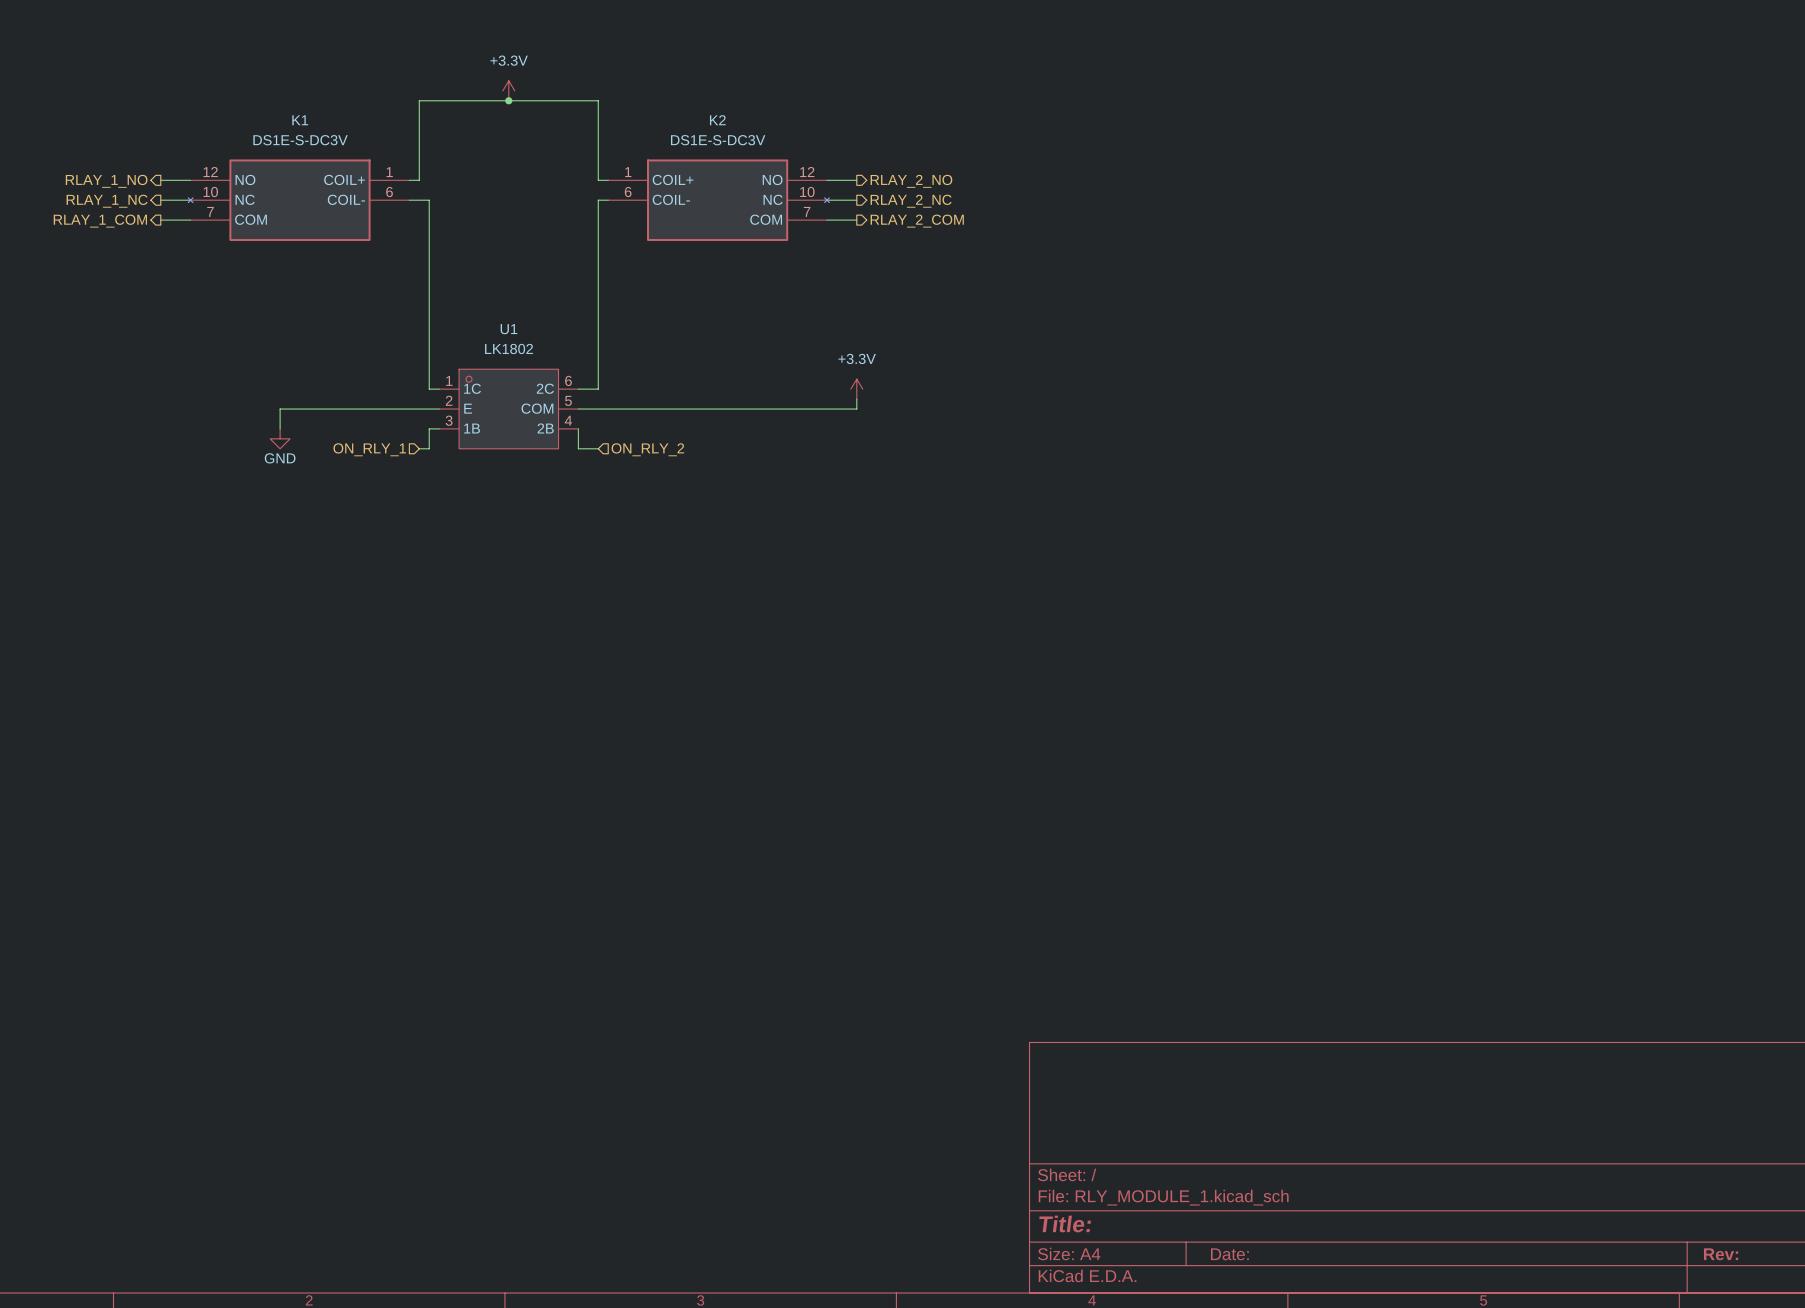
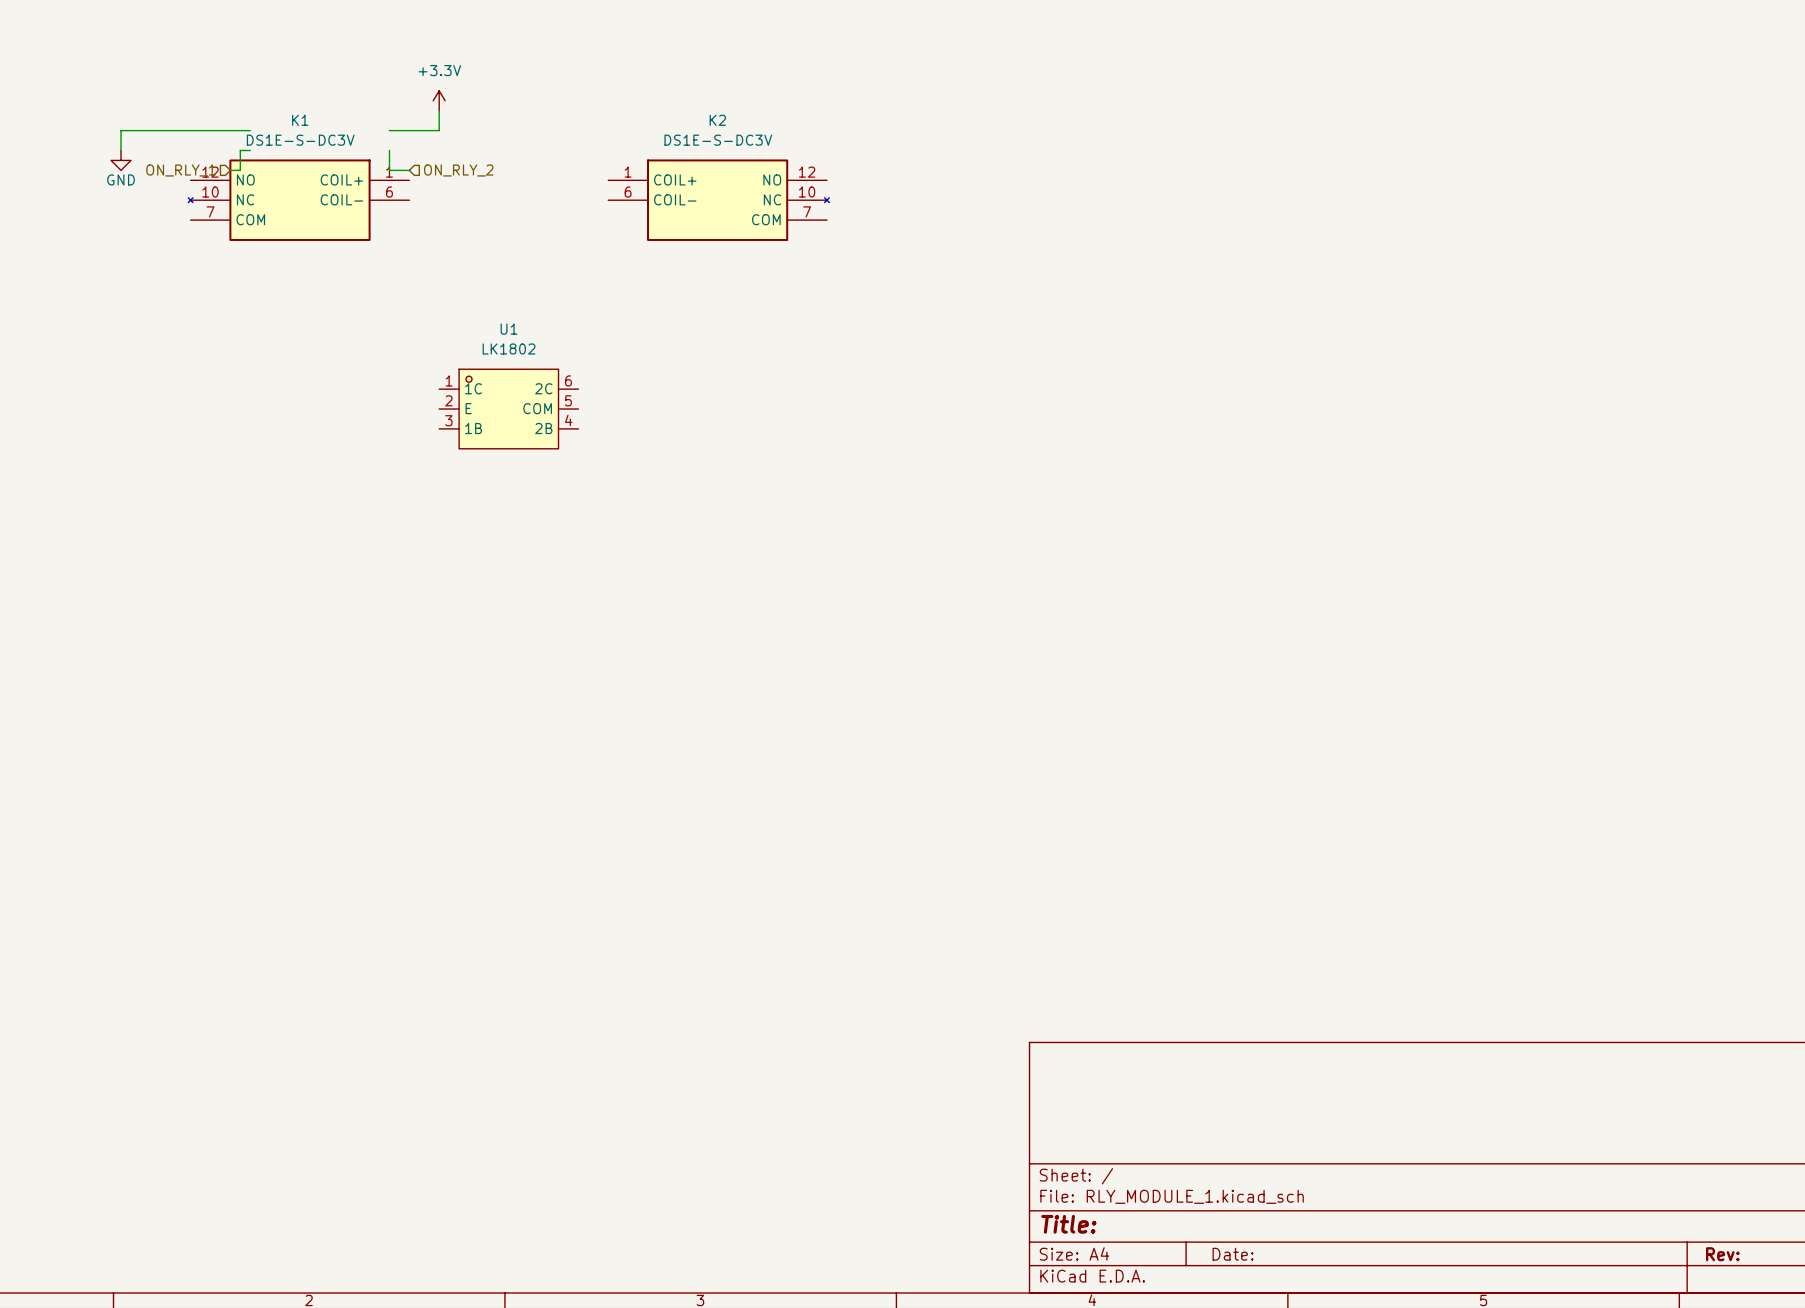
power symbol position: +3.3V (508, 90) -> +3.3V (439, 100)
junction: (508, 100) -> none
wire: none -> (439, 110) (439, 130) (389, 130)
wire: none -> (250, 130) (121, 130) (121, 150)
wire: none -> (250, 150) (240, 150) (240, 170) (230, 170)
wire: none -> (389, 150) (389, 170) (409, 170)
power symbol: none -> GND (121, 160)
hierarchical label: none -> ON_RLY_1 (180, 170)
hierarchical label: none -> ON_RLY_2 (458, 170)
wire: (160, 180) (190, 180) -> none
wire: (409, 180) (419, 180) (419, 100) (598, 100) (598, 180) (608, 180) -> none
wire: (826, 180) (856, 180) -> none
hierarchical label: RLAY_1_NO (106, 181) -> none
hierarchical label: RLAY_2_NO (911, 181) -> none
wire: (160, 200) (190, 200) -> none
wire: (409, 200) (429, 200) (429, 389) (439, 389) -> none
wire: (608, 200) (598, 200) (598, 389) (578, 389) -> none
wire: (826, 200) (856, 200) -> none
hierarchical label: RLAY_1_NC (107, 201) -> none
hierarchical label: RLAY_2_NC (911, 201) -> none
wire: (160, 220) (190, 220) -> none
wire: (826, 220) (856, 220) -> none
hierarchical label: RLAY_1_COM (100, 221) -> none
hierarchical label: RLAY_2_COM (917, 221) -> none
power symbol: +3.3V (856, 389) -> none
wire: (856, 399) (856, 409) (578, 409) -> none
wire: (439, 409) (280, 409) (280, 428) -> none
wire: (439, 428) (429, 428) (429, 448) (419, 448) -> none
wire: (578, 428) (578, 448) (598, 448) -> none
power symbol: GND (280, 438) -> none
hierarchical label: ON_RLY_1 (369, 449) -> none
hierarchical label: ON_RLY_2 (647, 449) -> none

